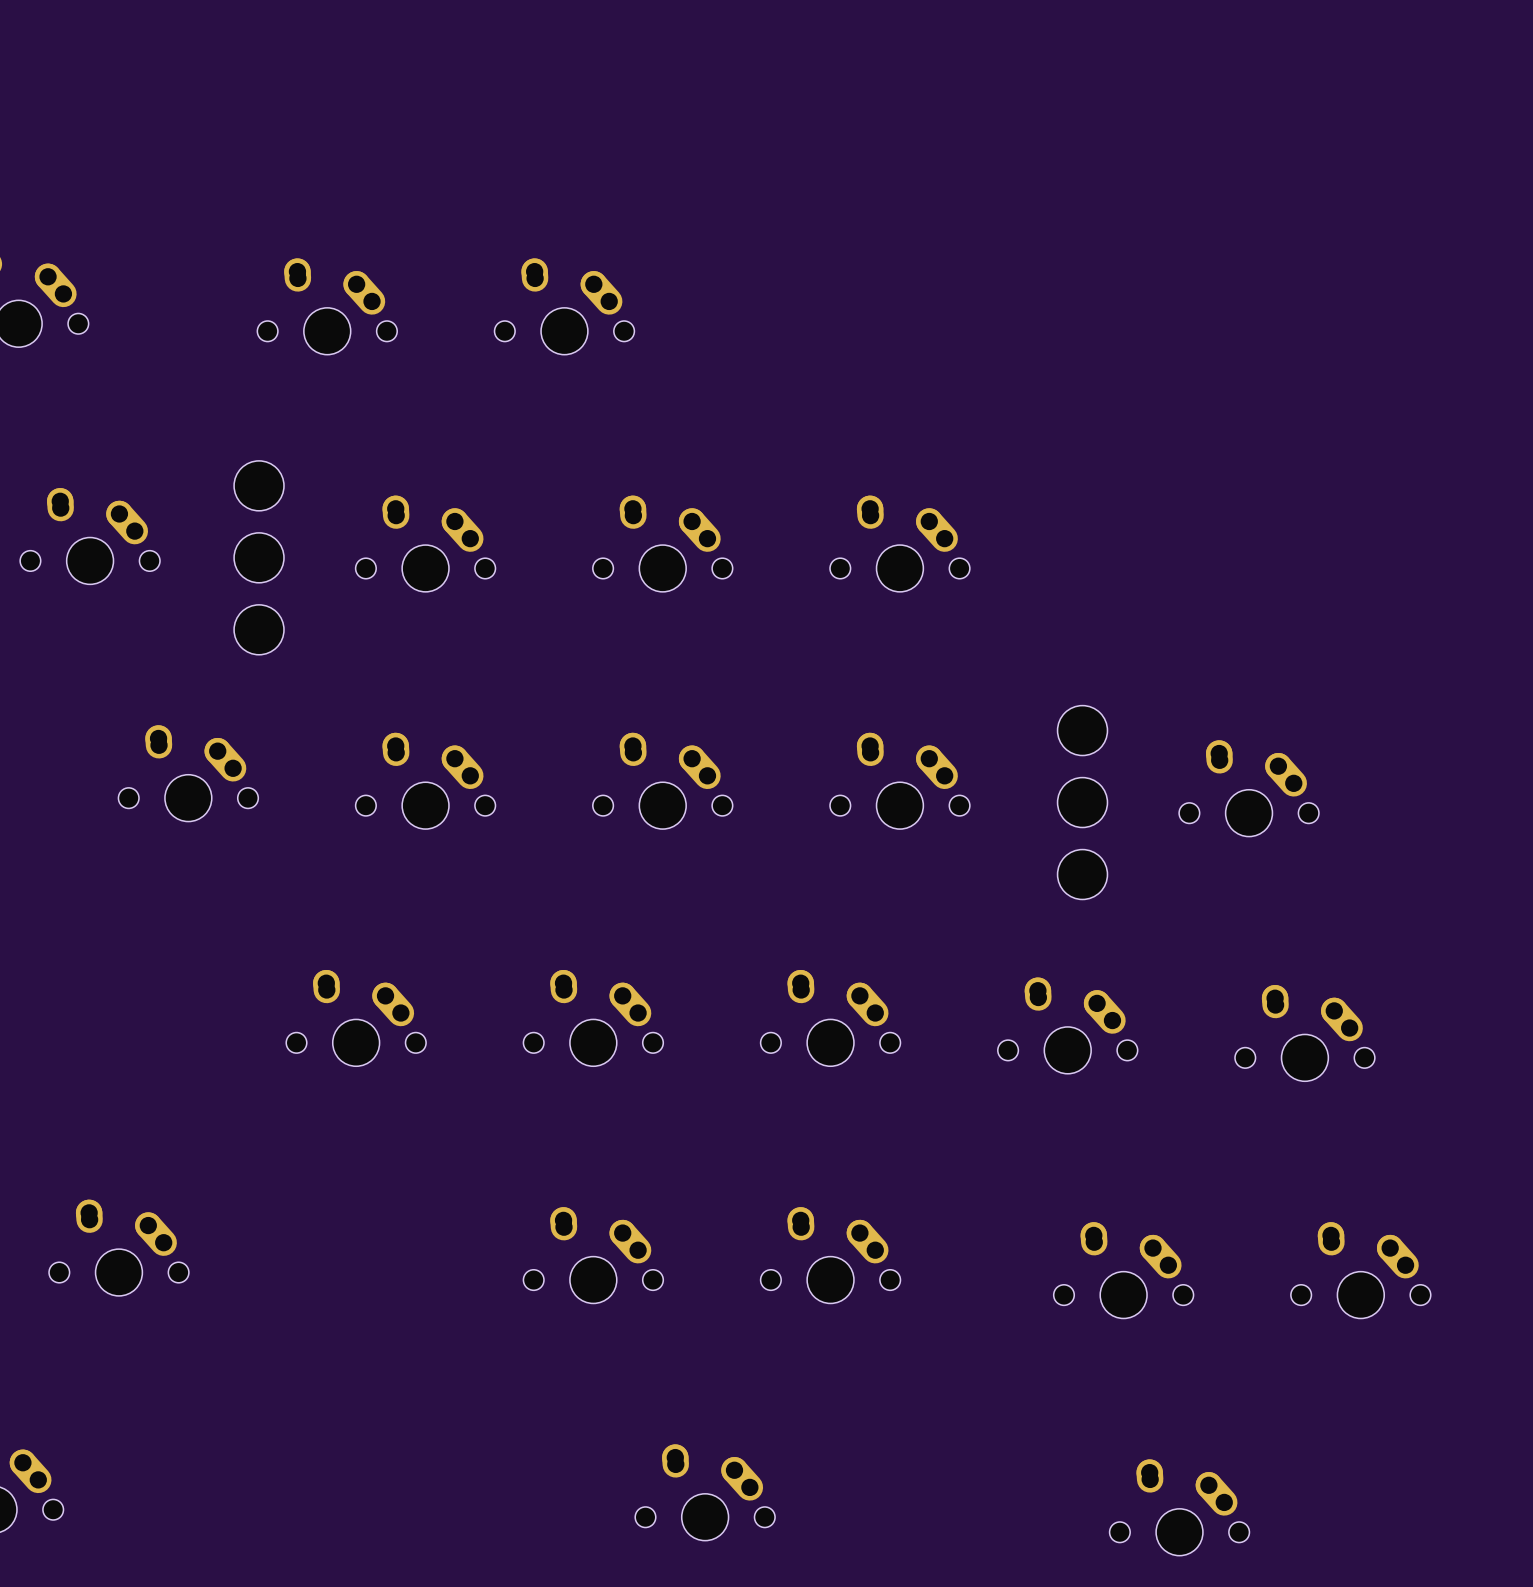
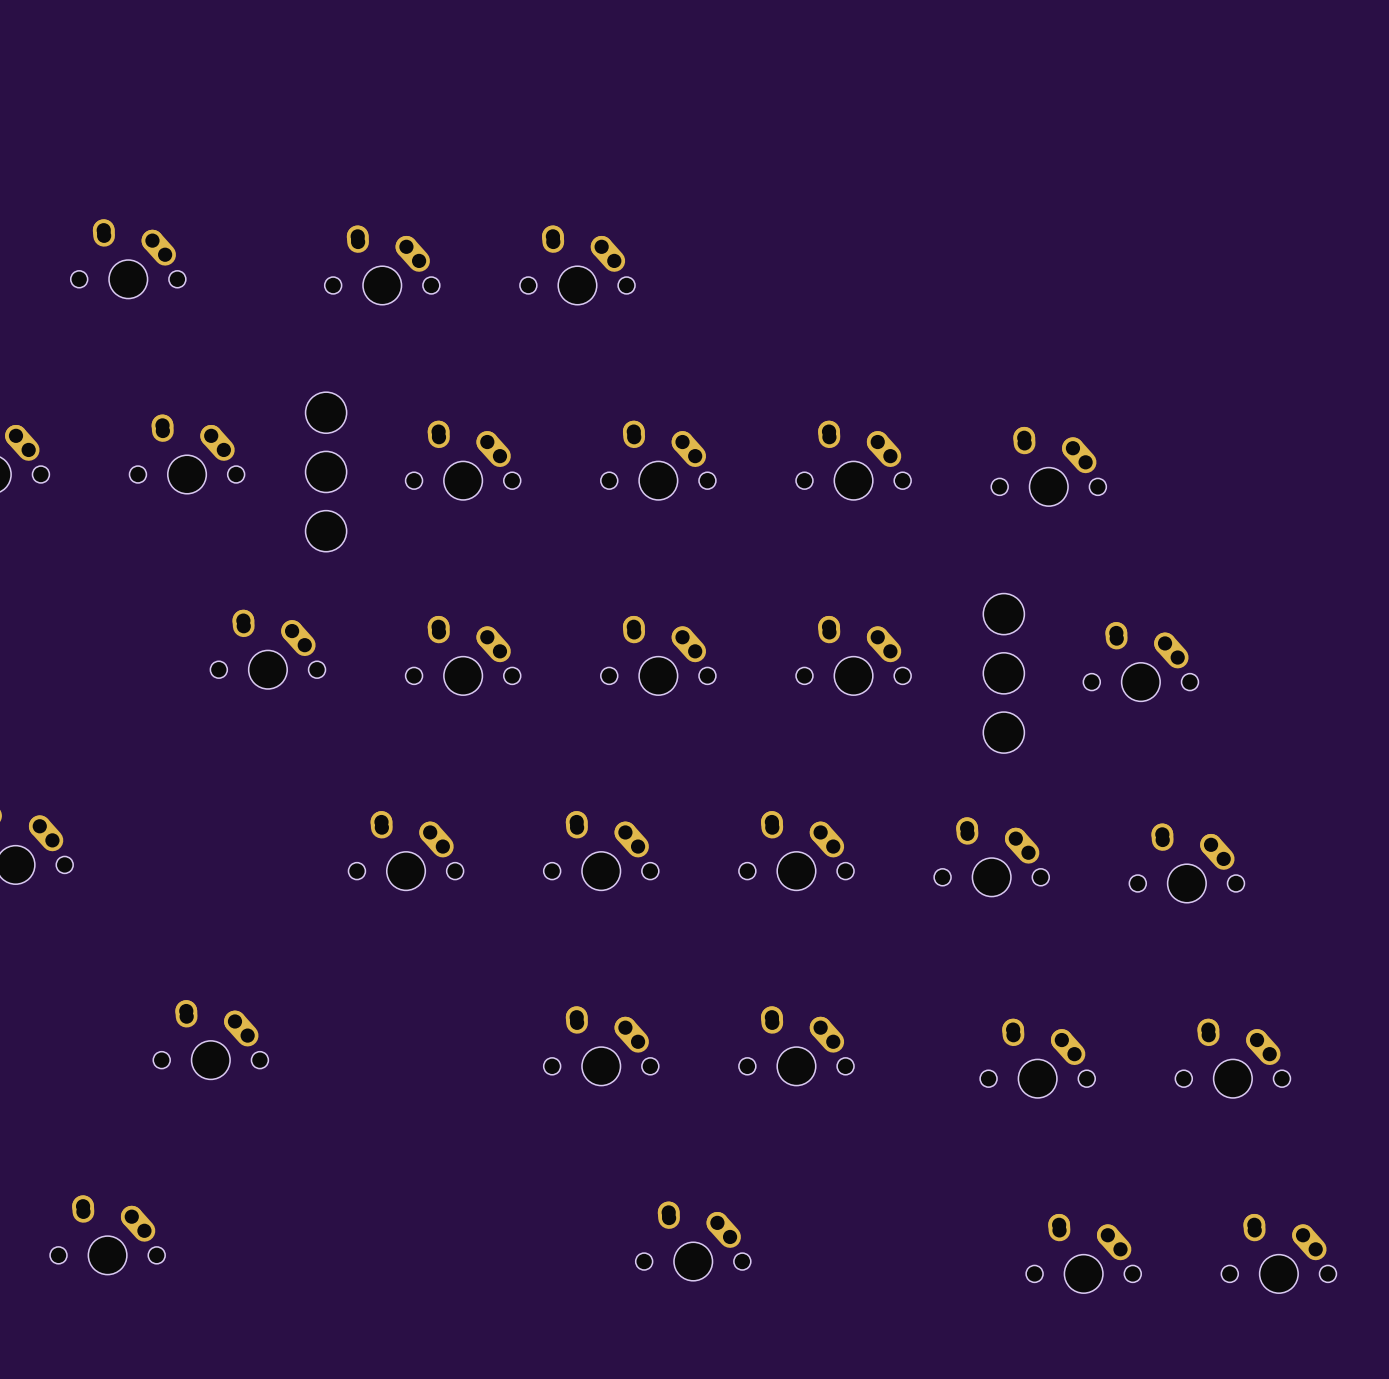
part: none -> (1048, 466)
part: none -> (1278, 1253)

